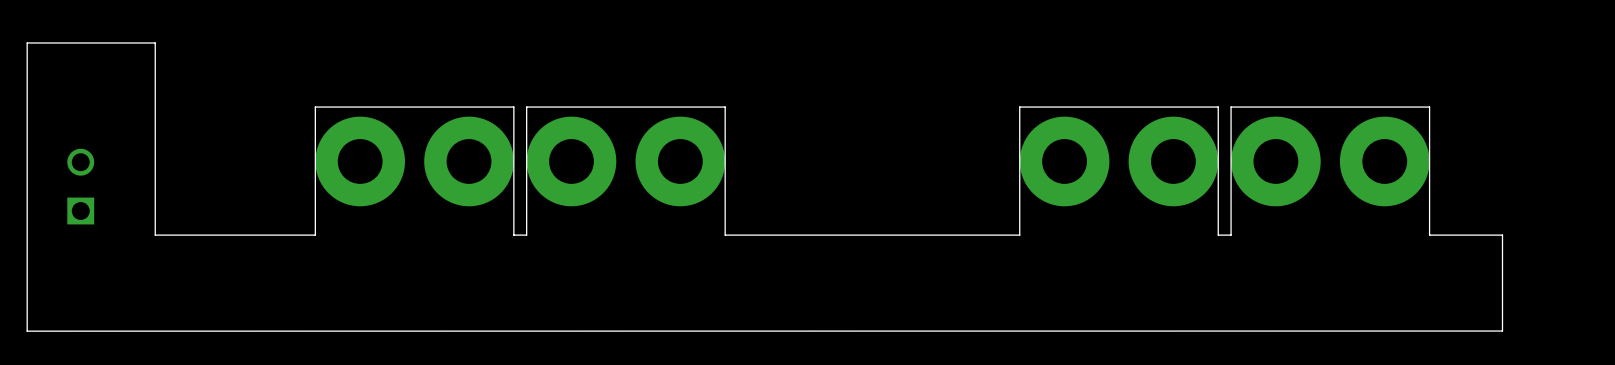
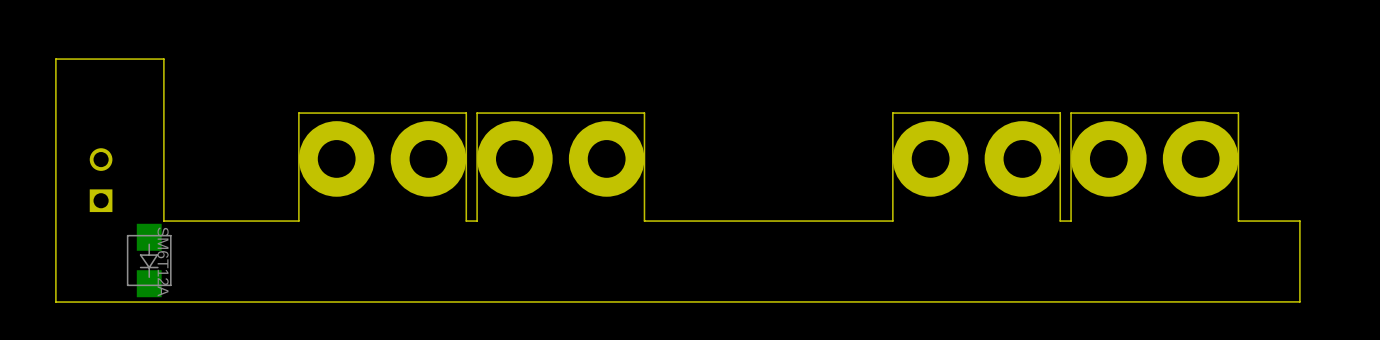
part: none -> SM6T12A (149, 260)

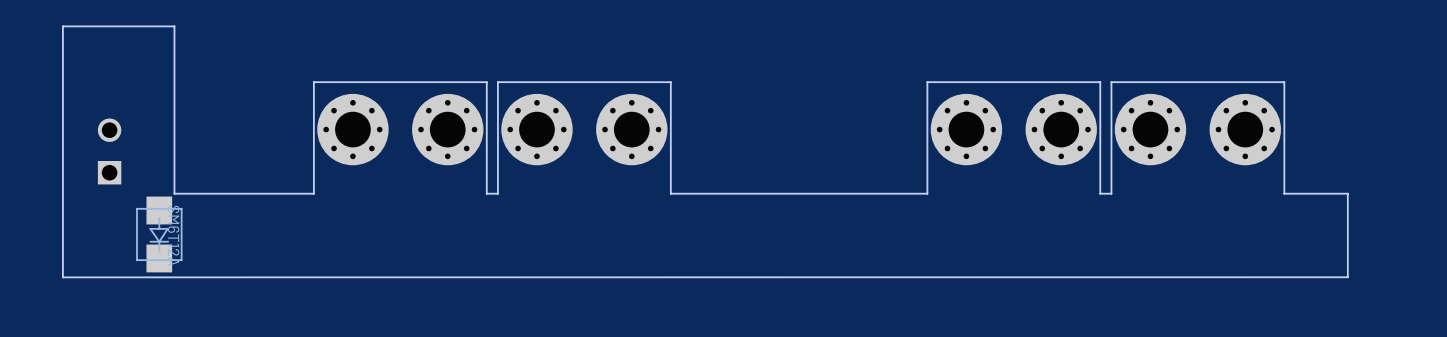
part footprint: [298, 121, 375, 197] -> [317, 93, 389, 166]
part footprint: [390, 121, 467, 197] -> [412, 93, 484, 166]
part footprint: [477, 121, 553, 197] -> [501, 93, 573, 166]
part footprint: [568, 121, 645, 197] -> [596, 93, 668, 166]
part footprint: [892, 121, 969, 197] -> [930, 93, 1003, 166]
part footprint: [984, 121, 1061, 197] -> [1025, 93, 1097, 166]
part footprint: [1071, 121, 1147, 197] -> [1114, 93, 1187, 166]
part footprint: [1162, 121, 1239, 197] -> [1209, 93, 1281, 166]

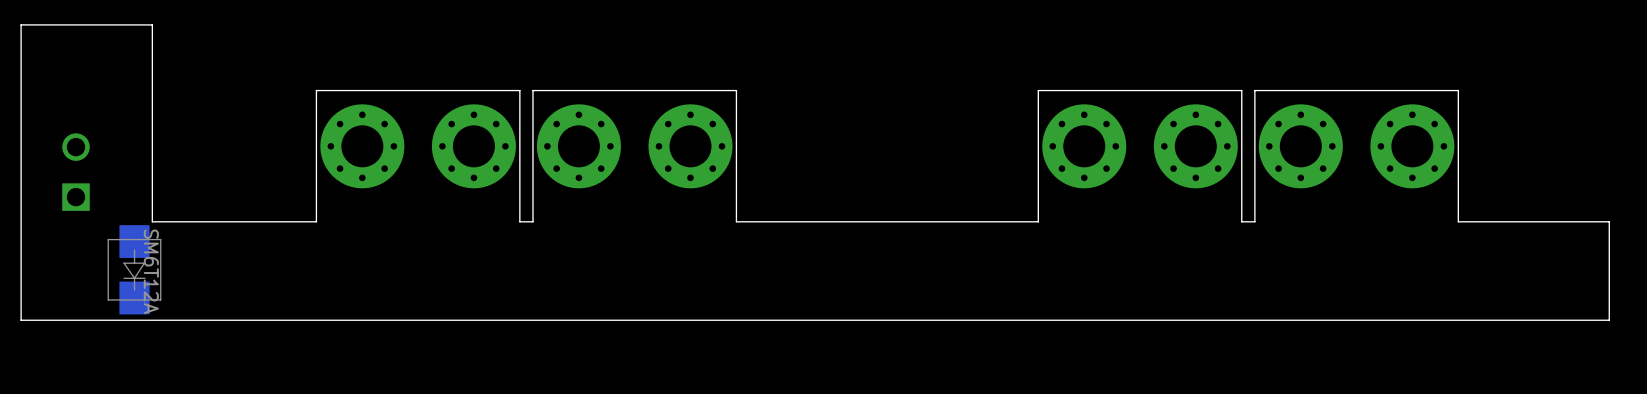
board edge: (1347, 193) (1347, 277) (62, 277) -> (1533, 221) (1609, 221) (1609, 320) (21, 320)

